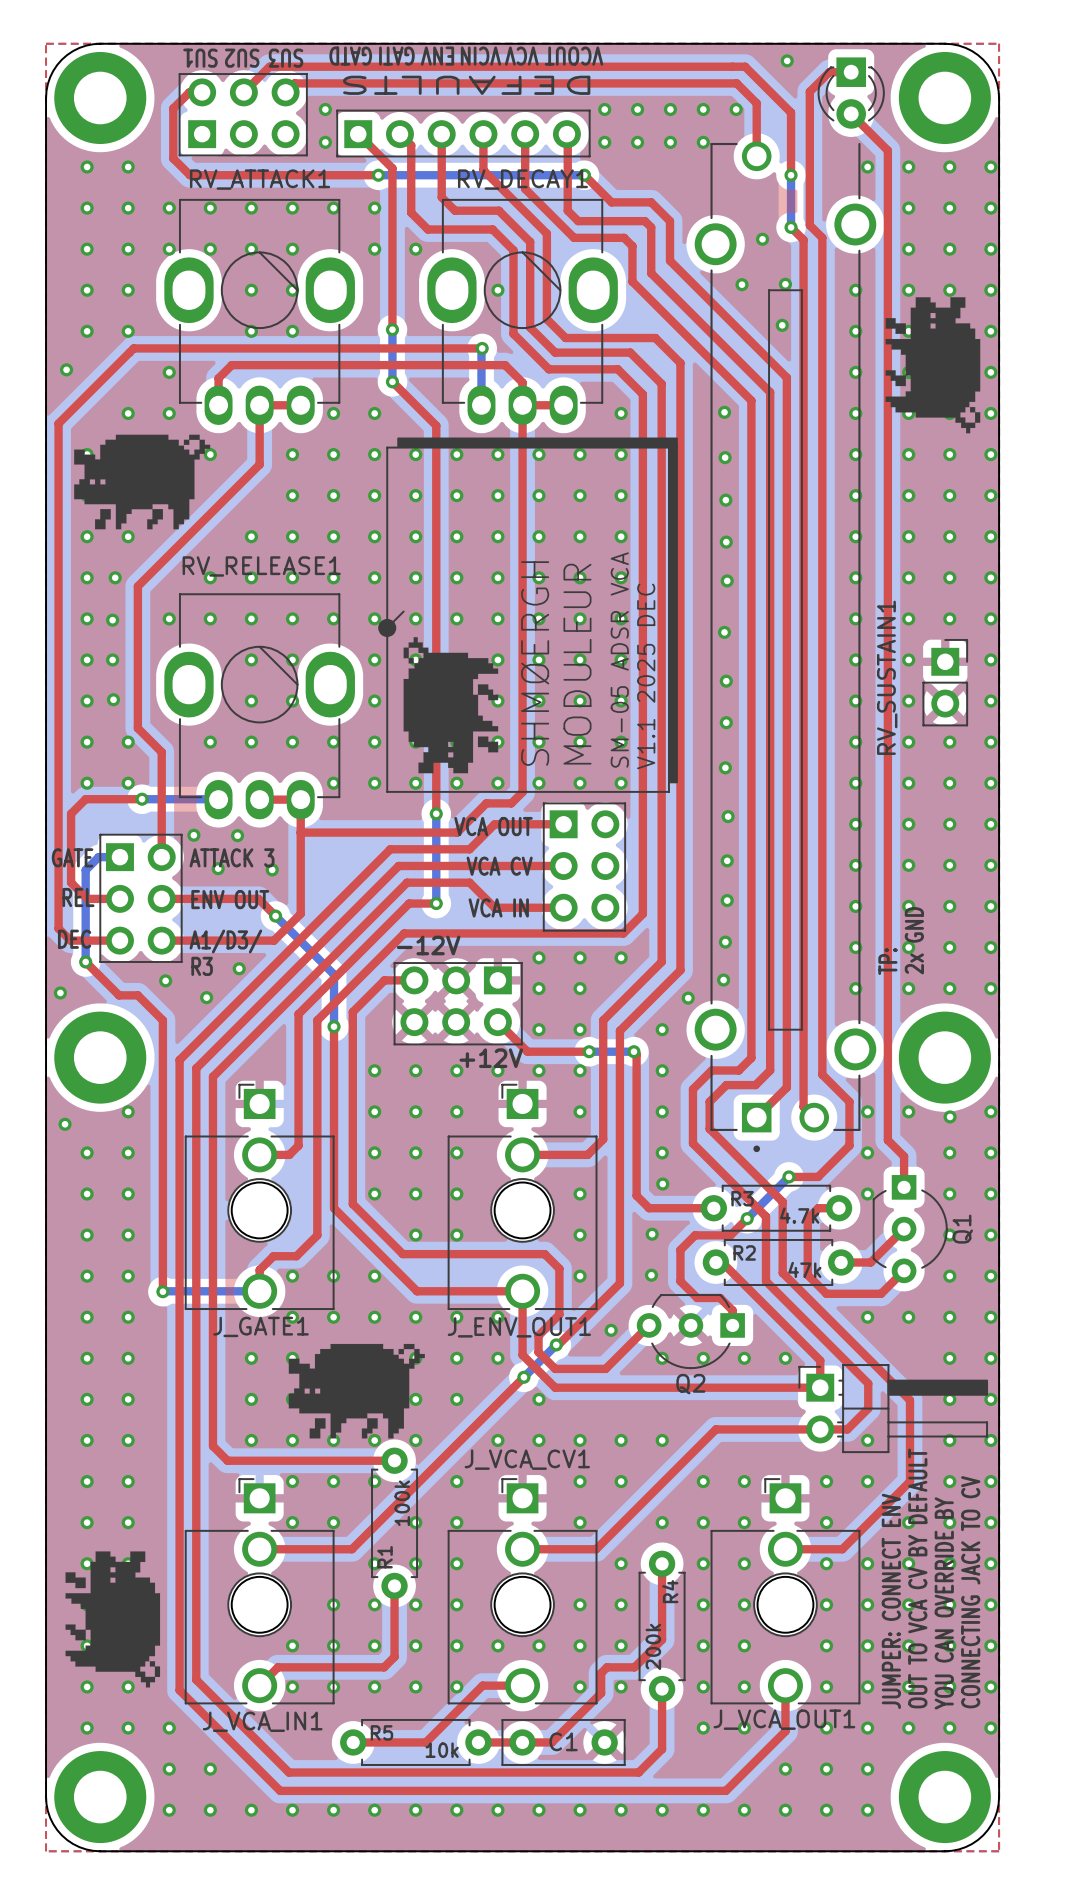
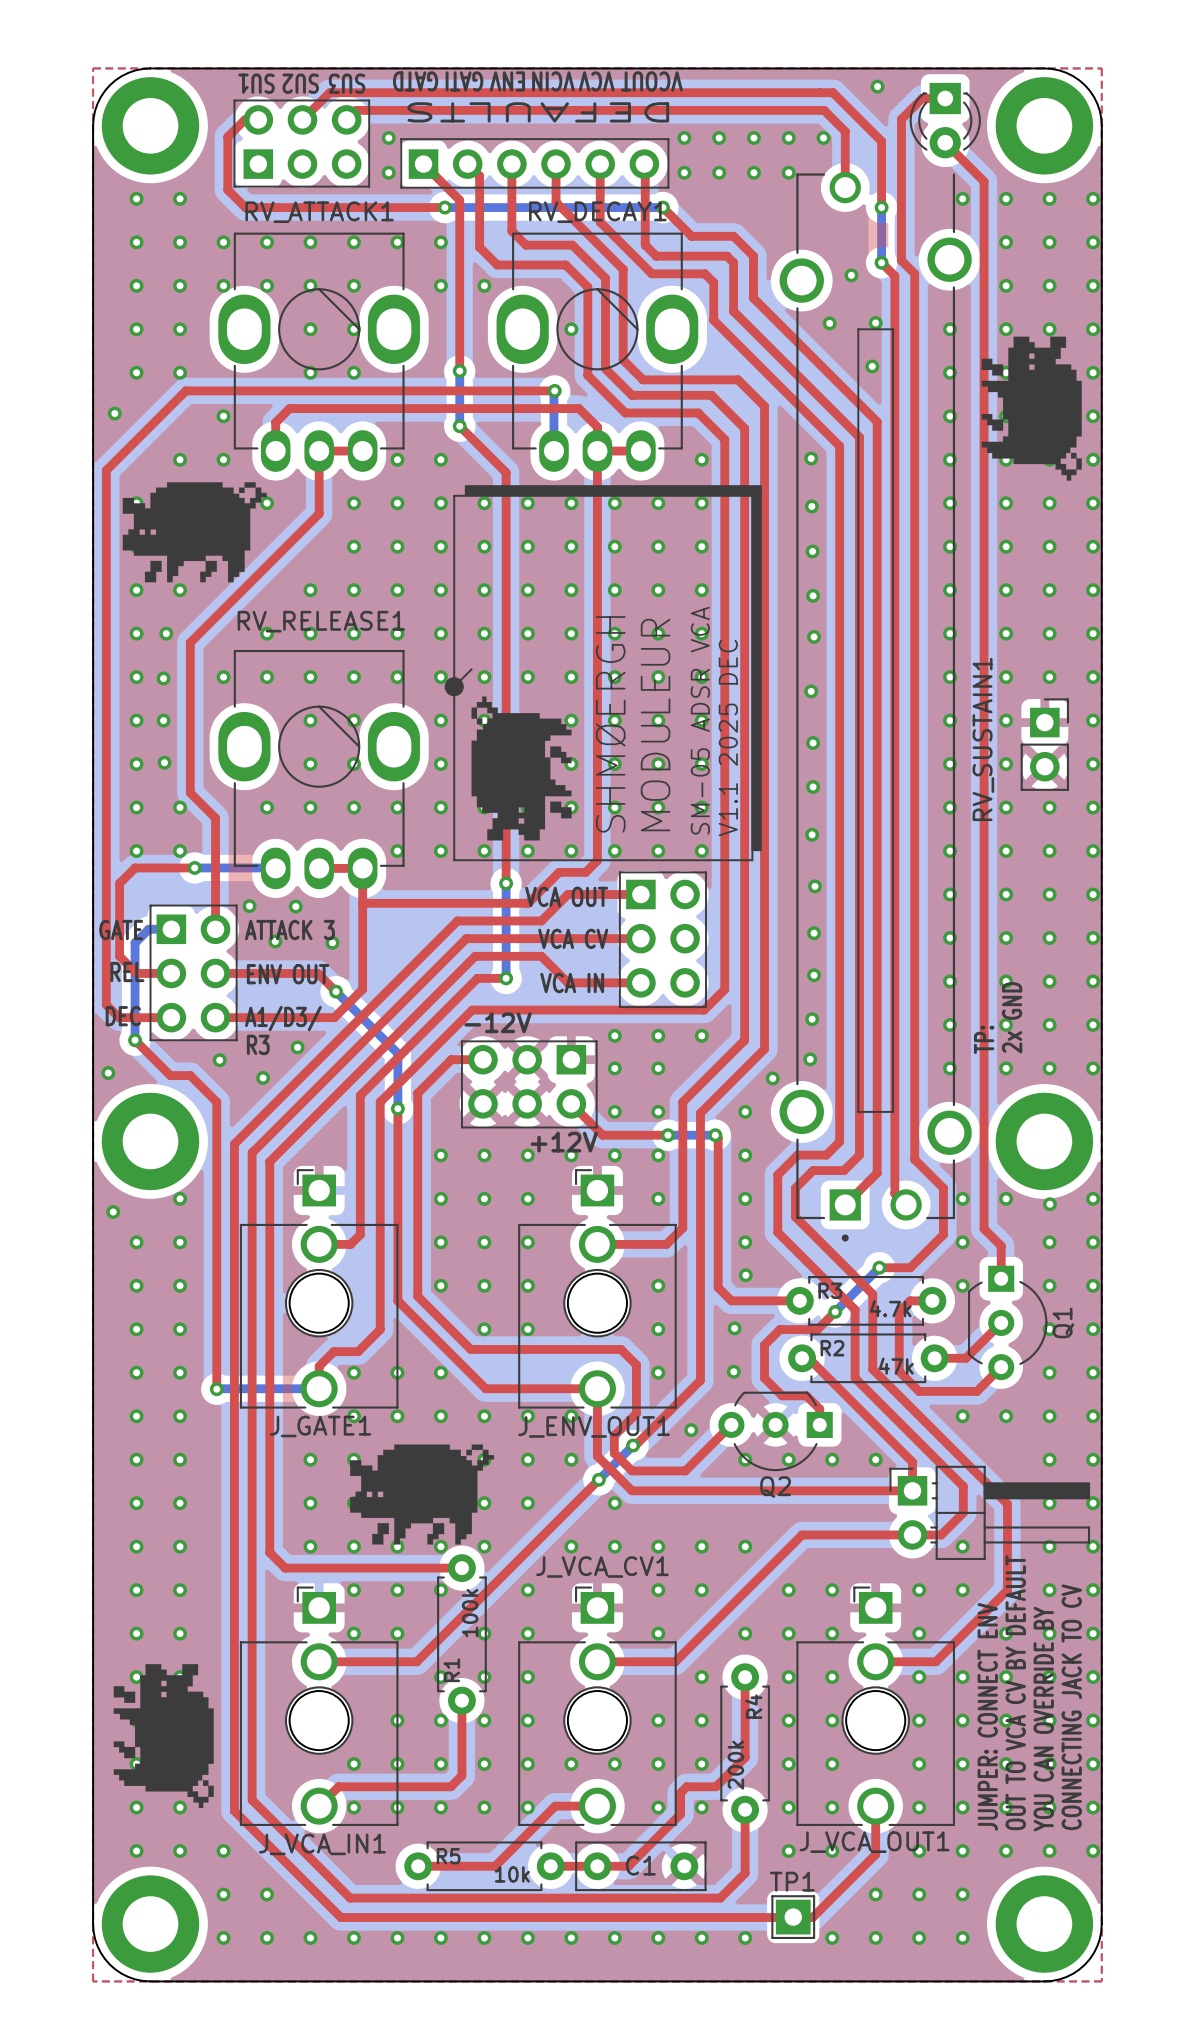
TP1: none -> (793, 1917)
via: (703, 1810) -> none

